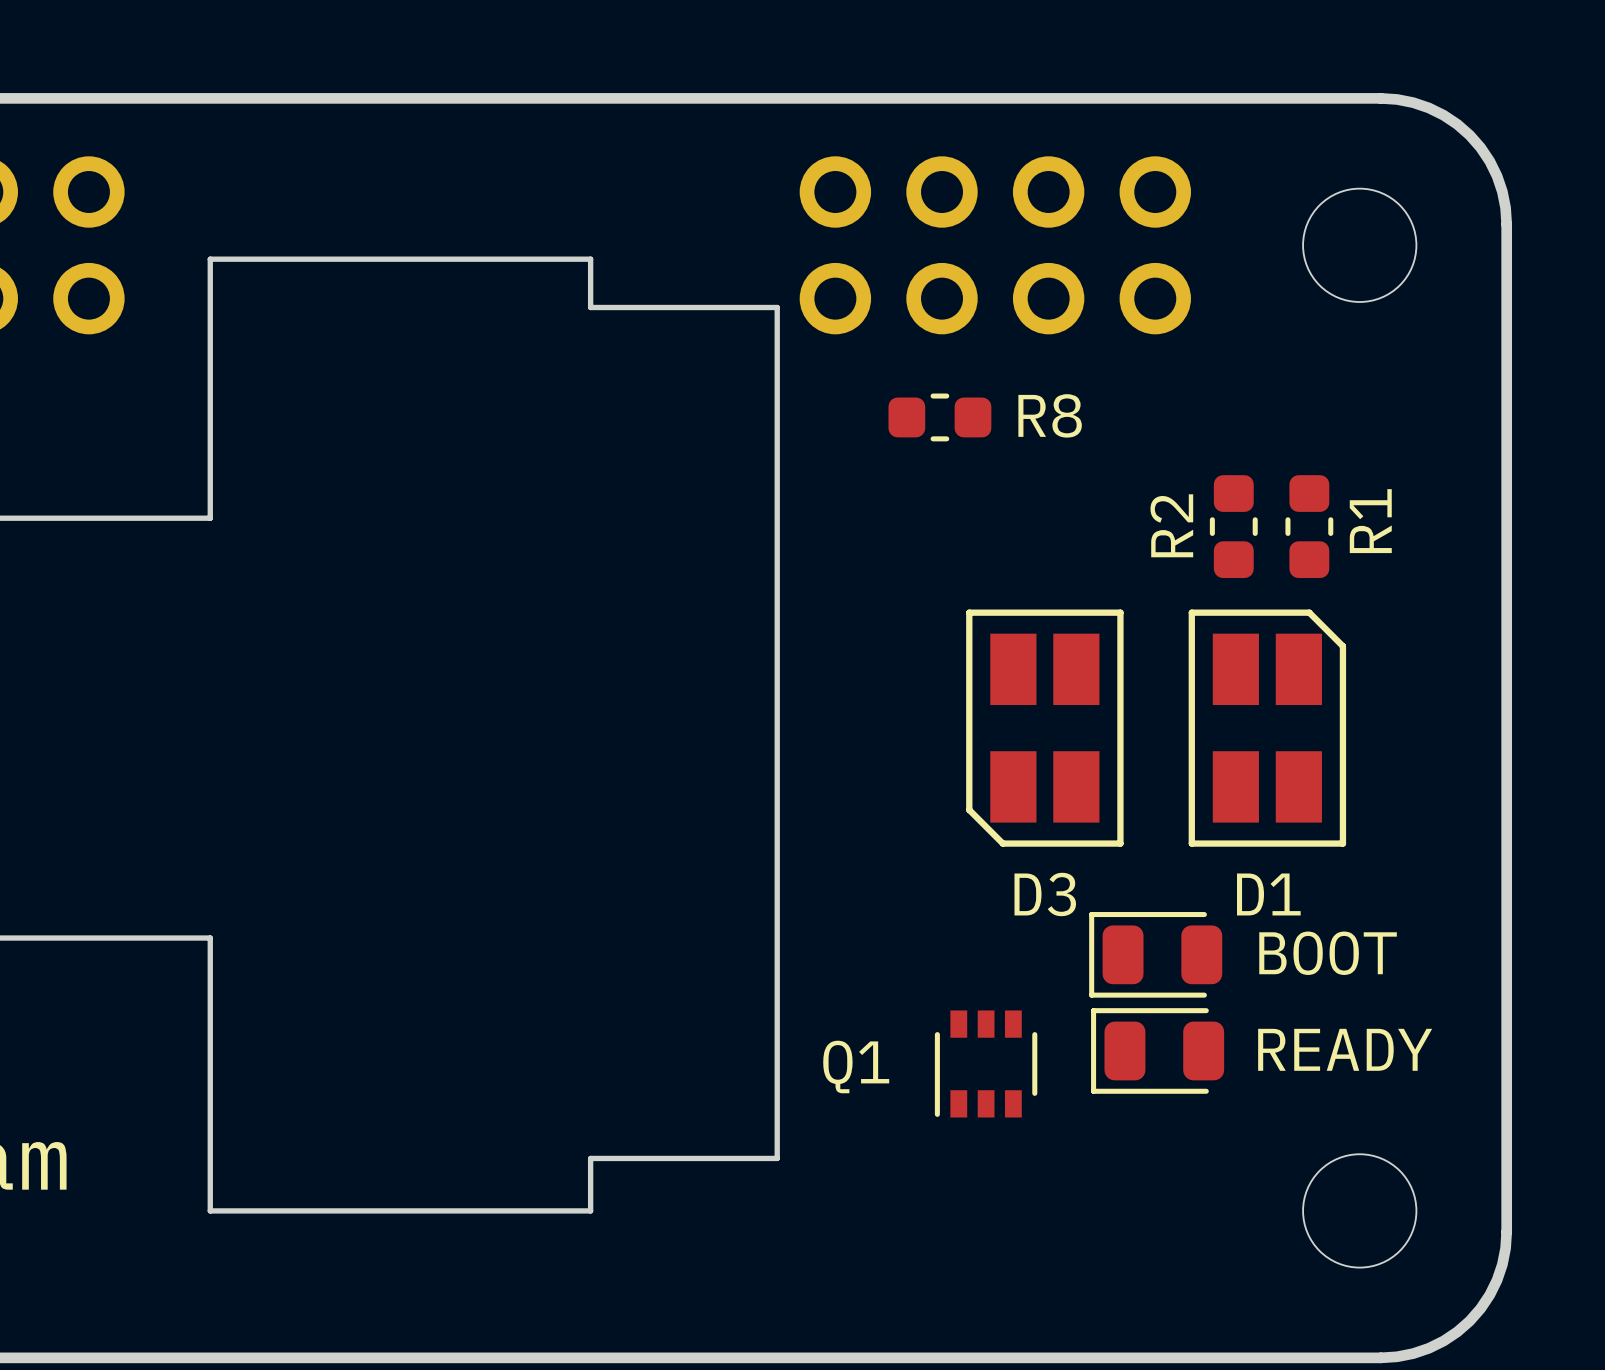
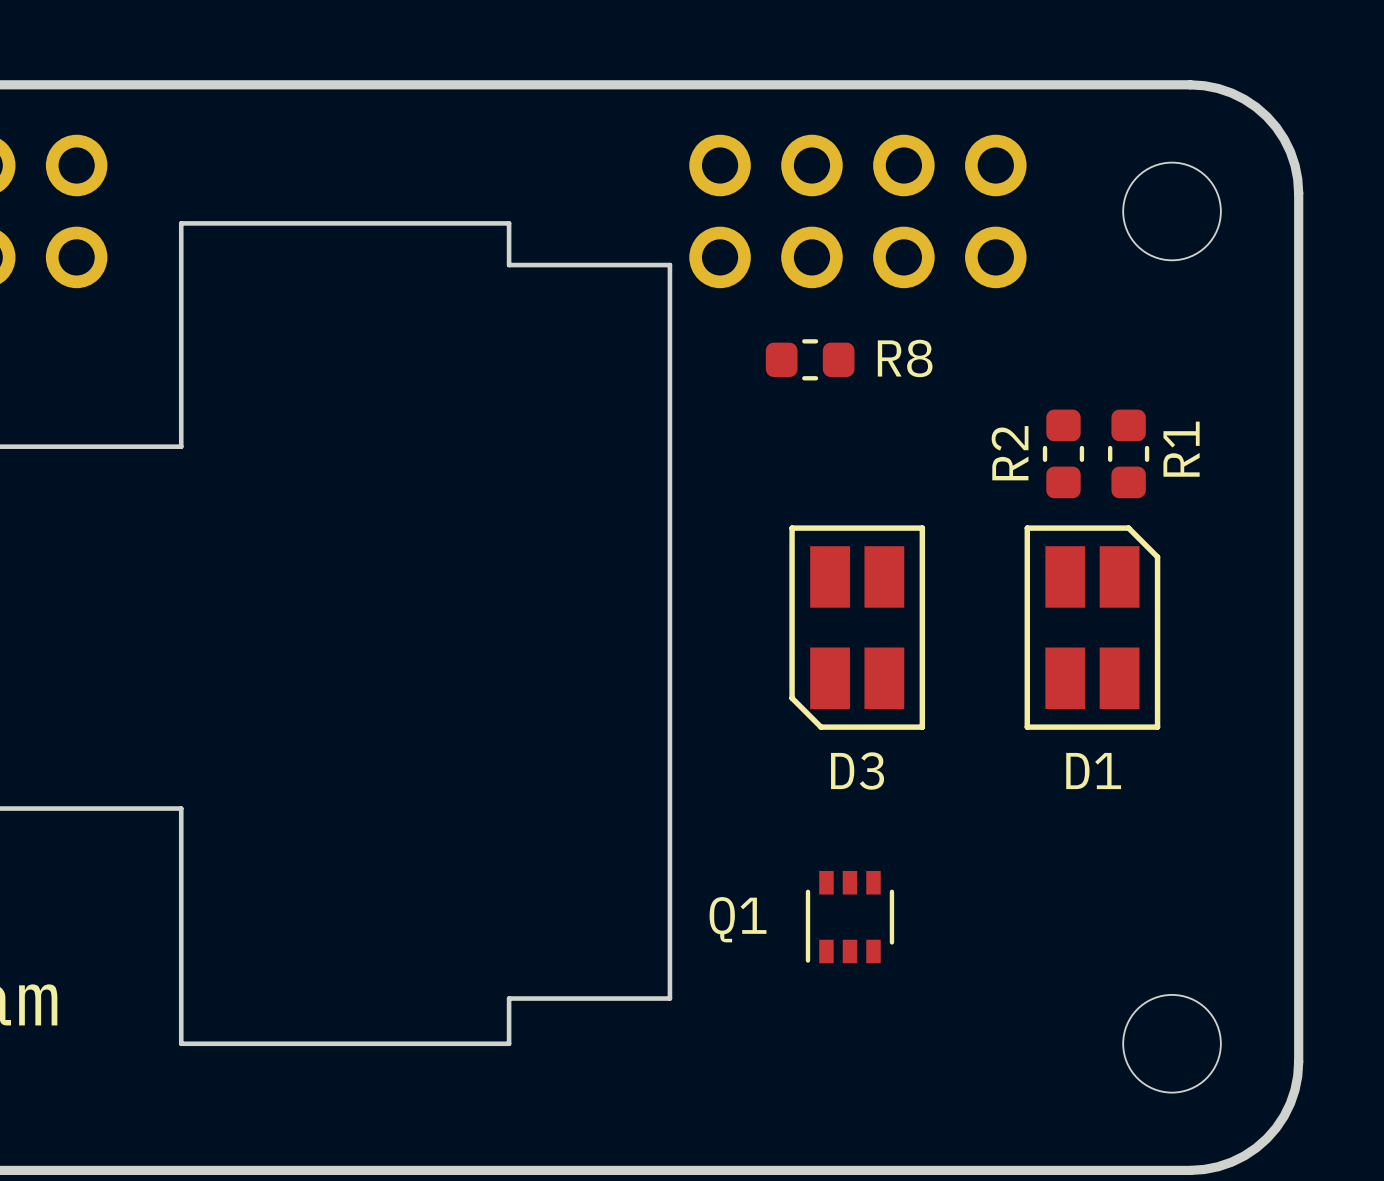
D3 position: (1044, 728) -> (857, 627)
text: BOOT (1328, 953) -> none
part: (1155, 954) -> none
text: READY (1345, 1049) -> none
part: (1157, 1050) -> none

